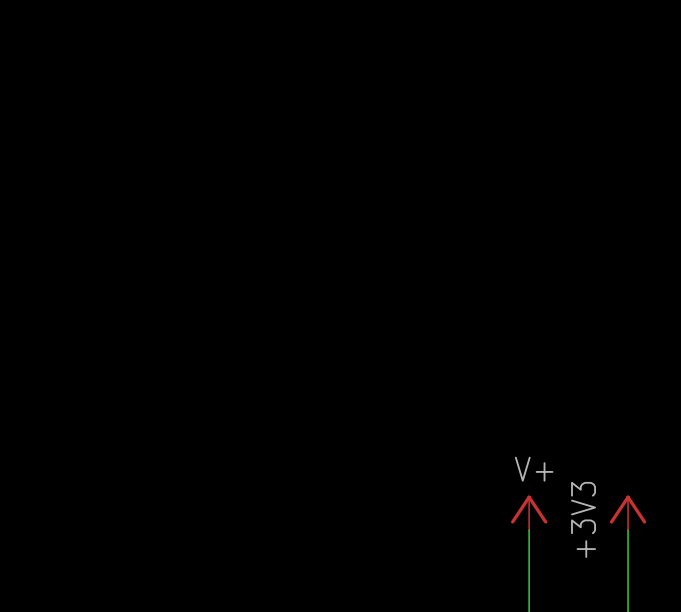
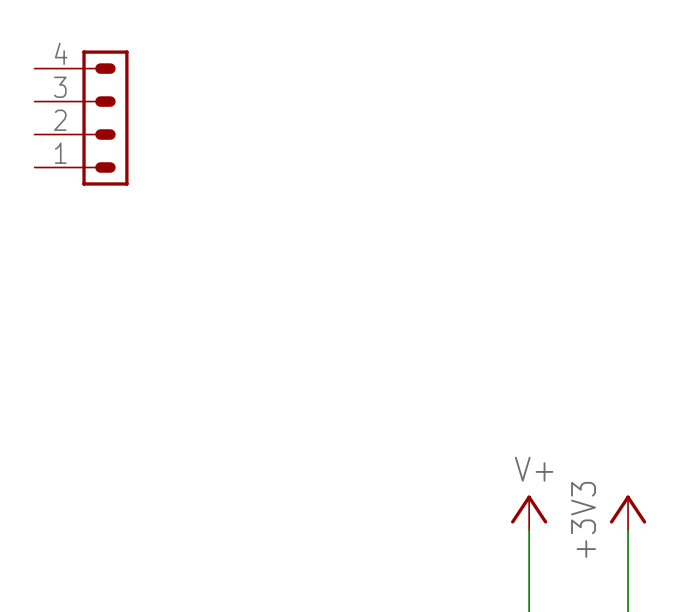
part: none -> (81, 118)

